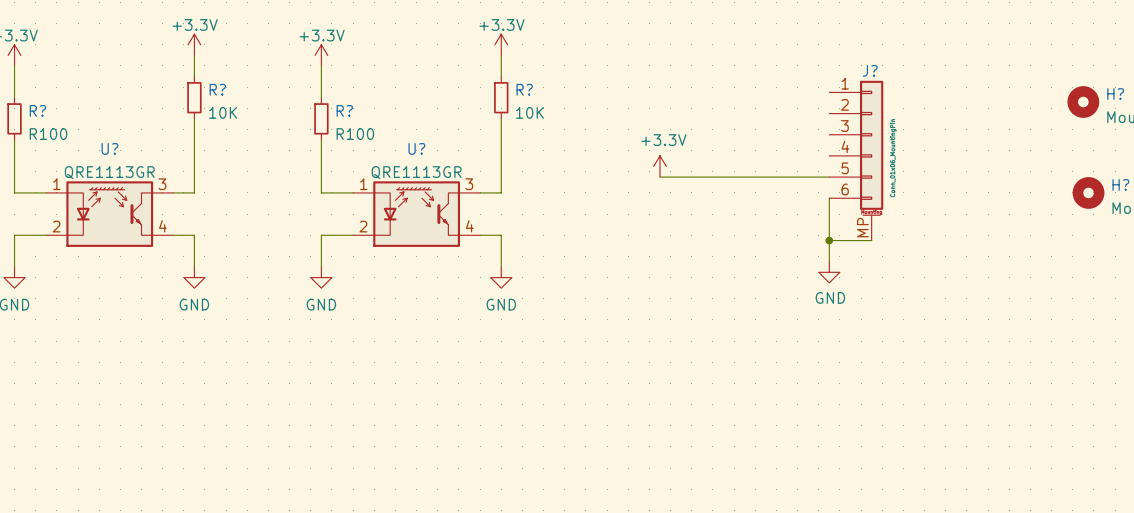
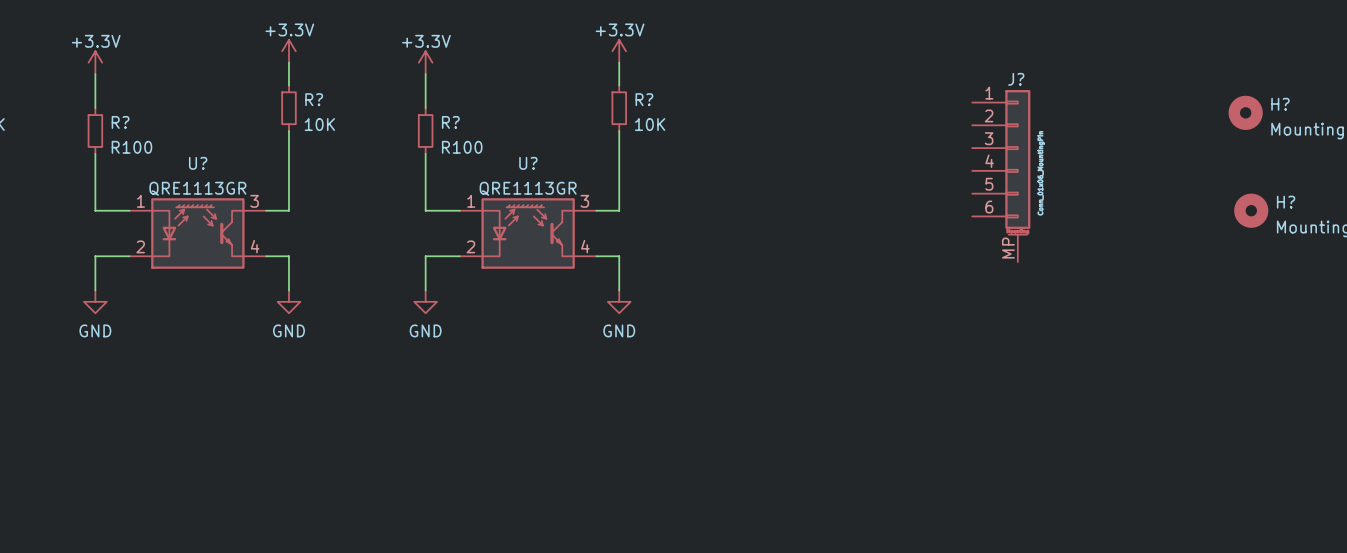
power symbol: +3.3V (660, 166) -> none
wire: (660, 177) (829, 177) -> none
wire: (829, 198) (829, 261) -> none
wire: (829, 240) (871, 240) -> none
junction: (829, 240) -> none
power symbol: GND (829, 272) -> none

